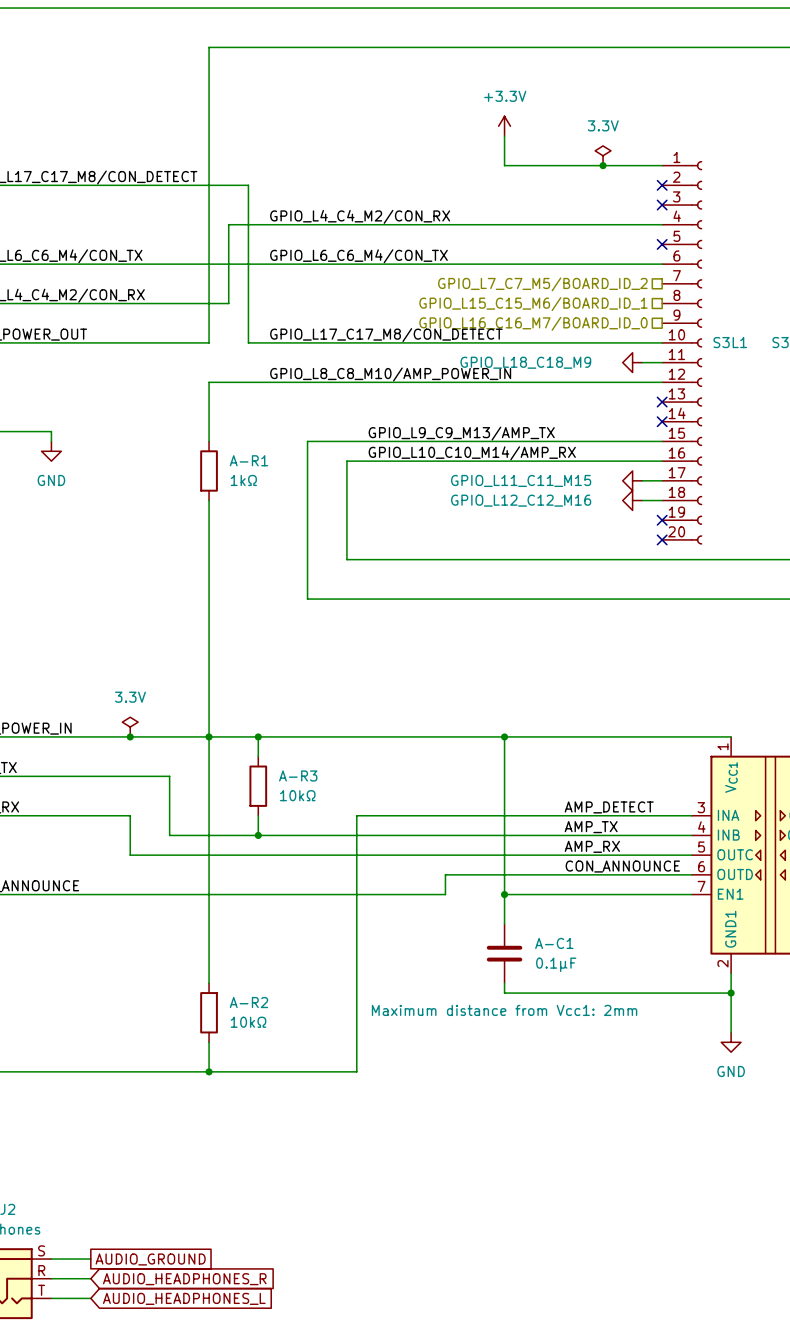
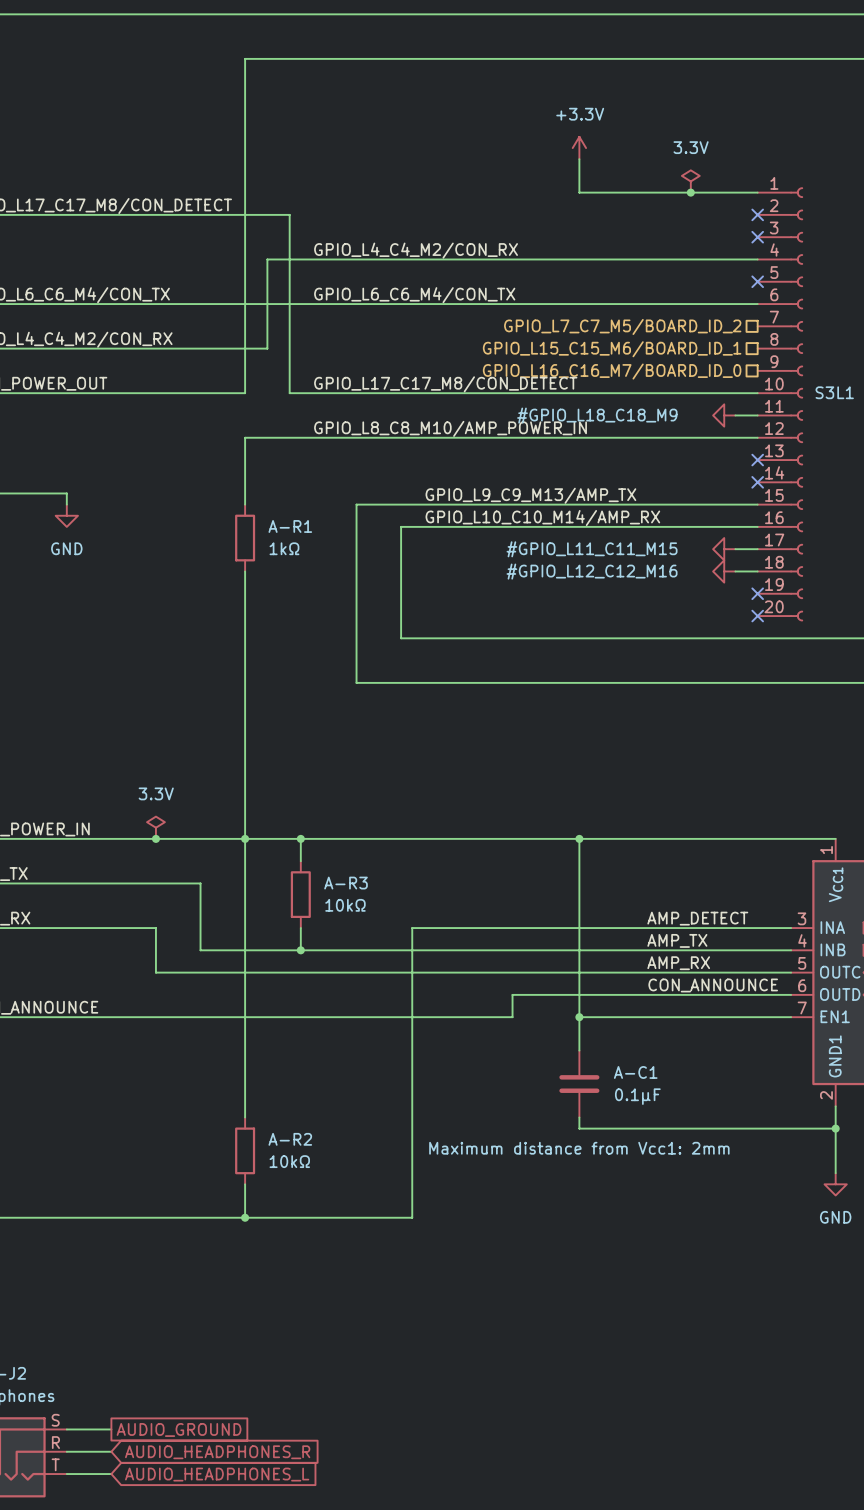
GPIO_L18_C18_M9 name: GPIO_L18_C18_M9 (525, 362) -> #GPIO_L18_C18_M9 (597, 415)
GPIO_L11_C11_M15 name: GPIO_L11_C11_M15 (521, 480) -> #GPIO_L11_C11_M15 (592, 549)
GPIO_L12_C12_M16 name: GPIO_L12_C12_M16 (521, 500) -> #GPIO_L12_C12_M16 (592, 571)

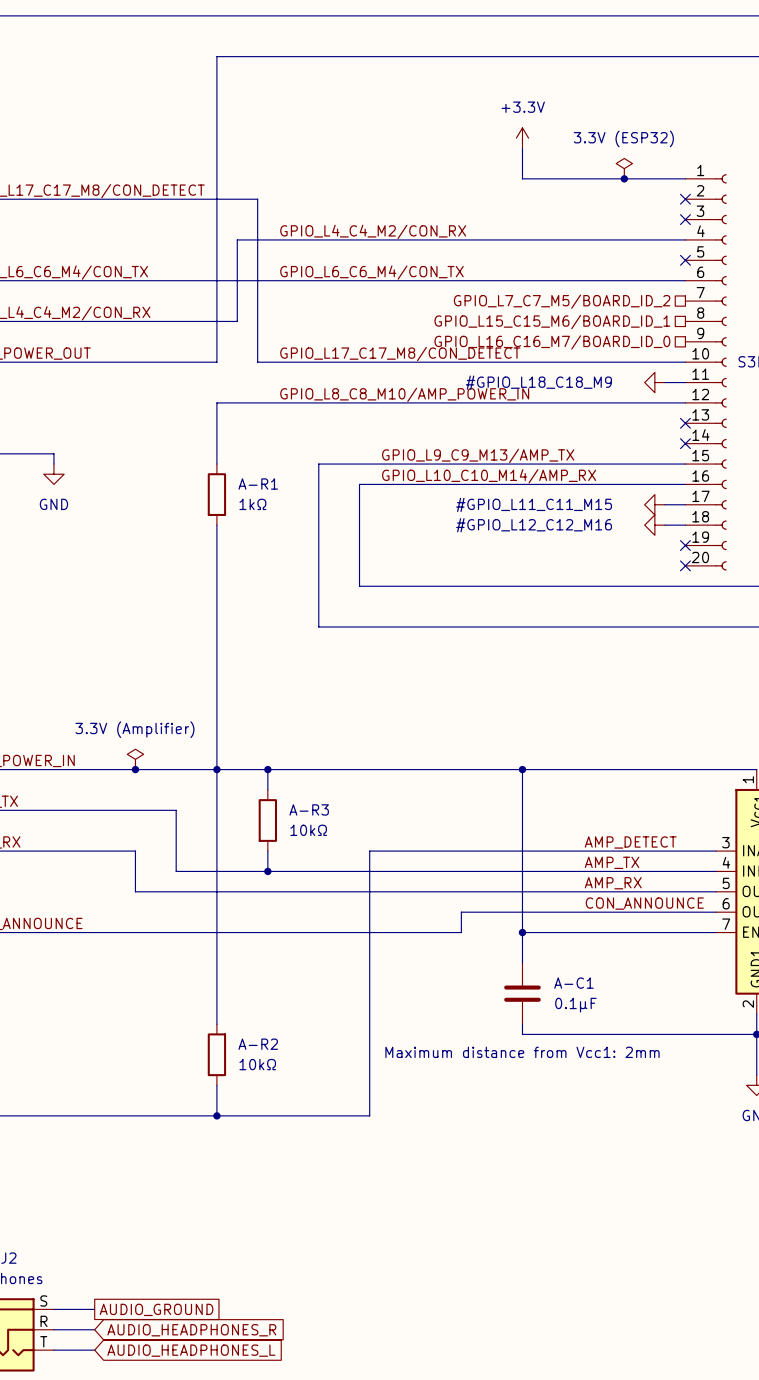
power symbol: 3.3V (690, 181) -> 3.3V (ESP32) (624, 168)
power symbol: 3.3V (155, 827) -> 3.3V (Amplifier) (135, 759)

